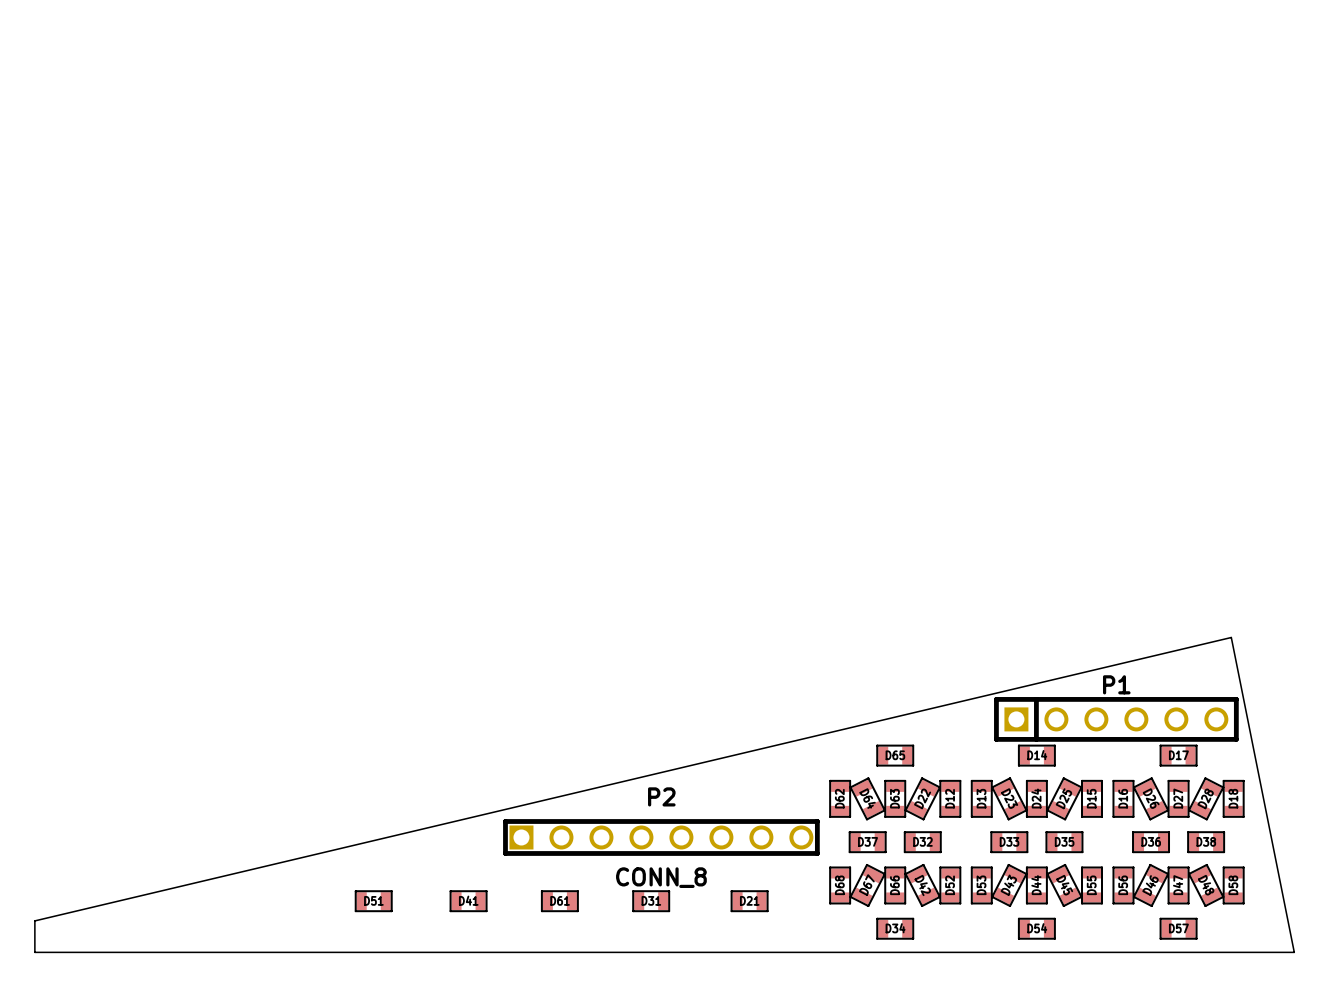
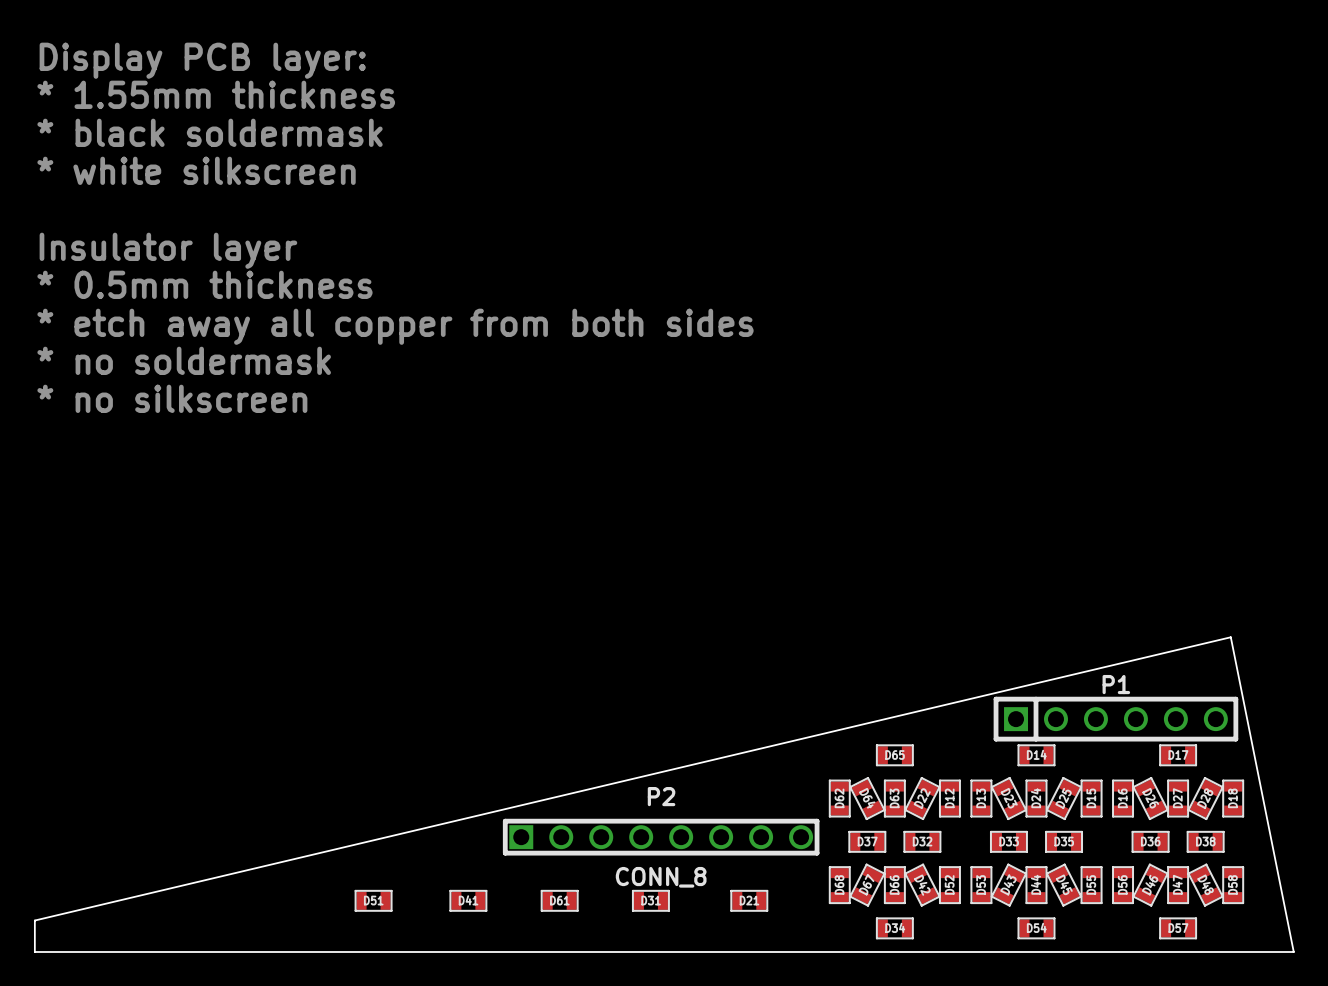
text: none -> Display PCB layer: (202, 60)
text: none -> * 1.55mm thickness (216, 94)
text: none -> * black soldermask (210, 132)
text: none -> * white silkscreen (196, 170)
text: none -> Insulator layer (168, 250)
text: none -> * 0.5mm thickness (204, 284)
text: none -> * etch away all copper from both sides (395, 326)
text: none -> * no soldermask (184, 360)
text: none -> * no silkscreen (172, 398)

